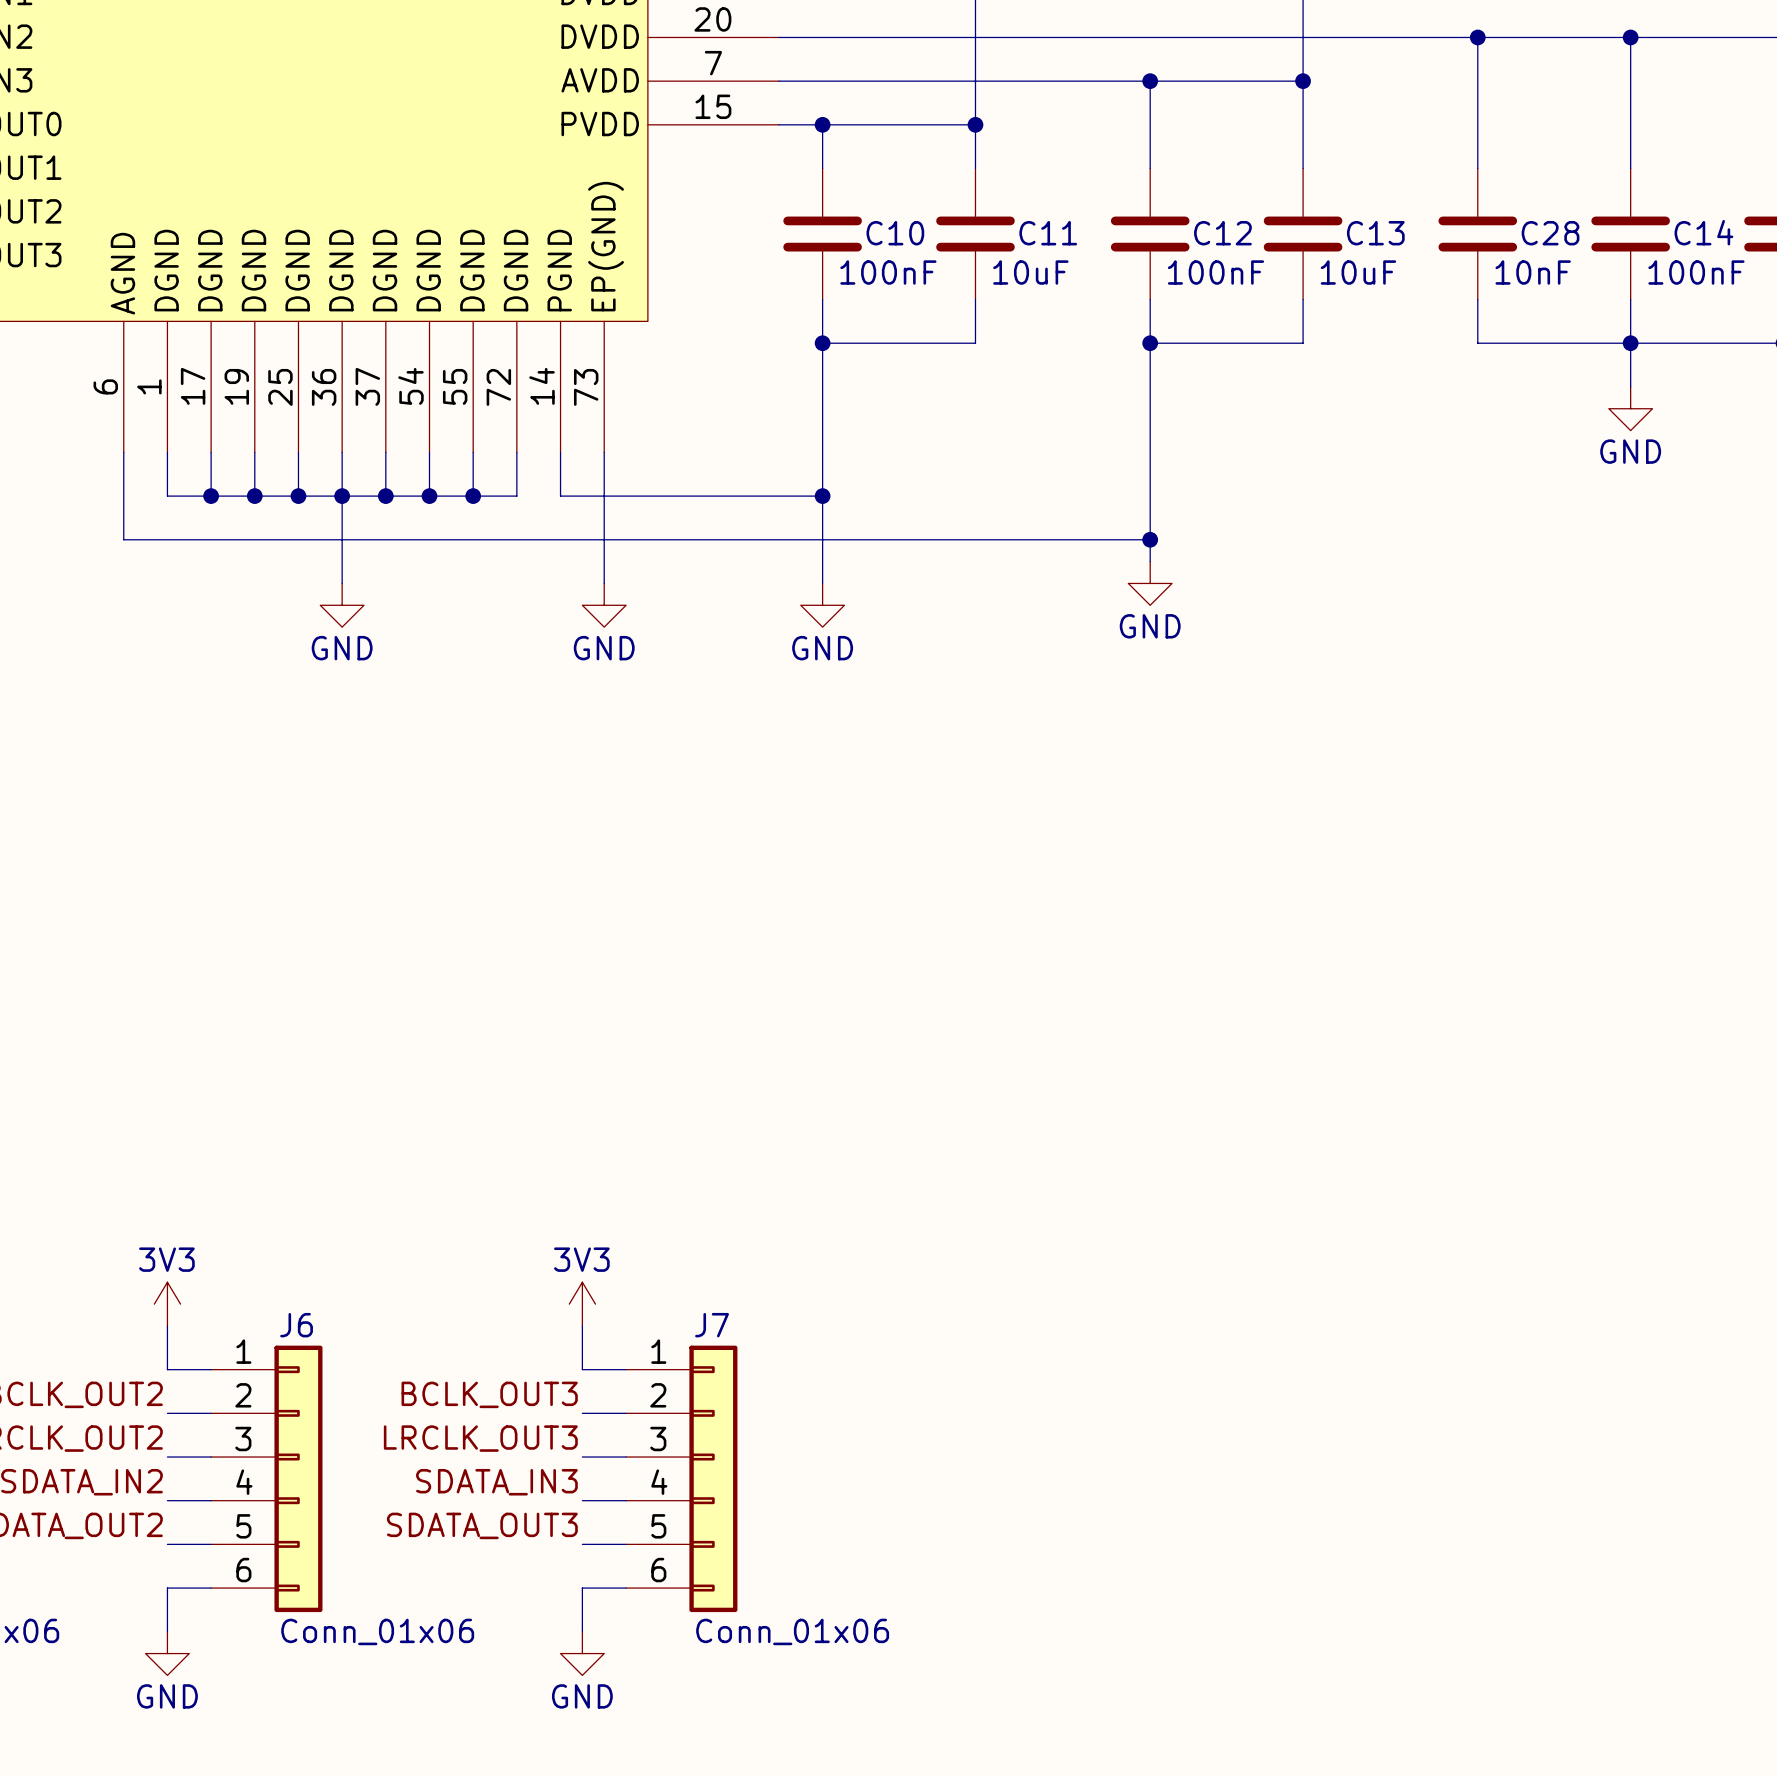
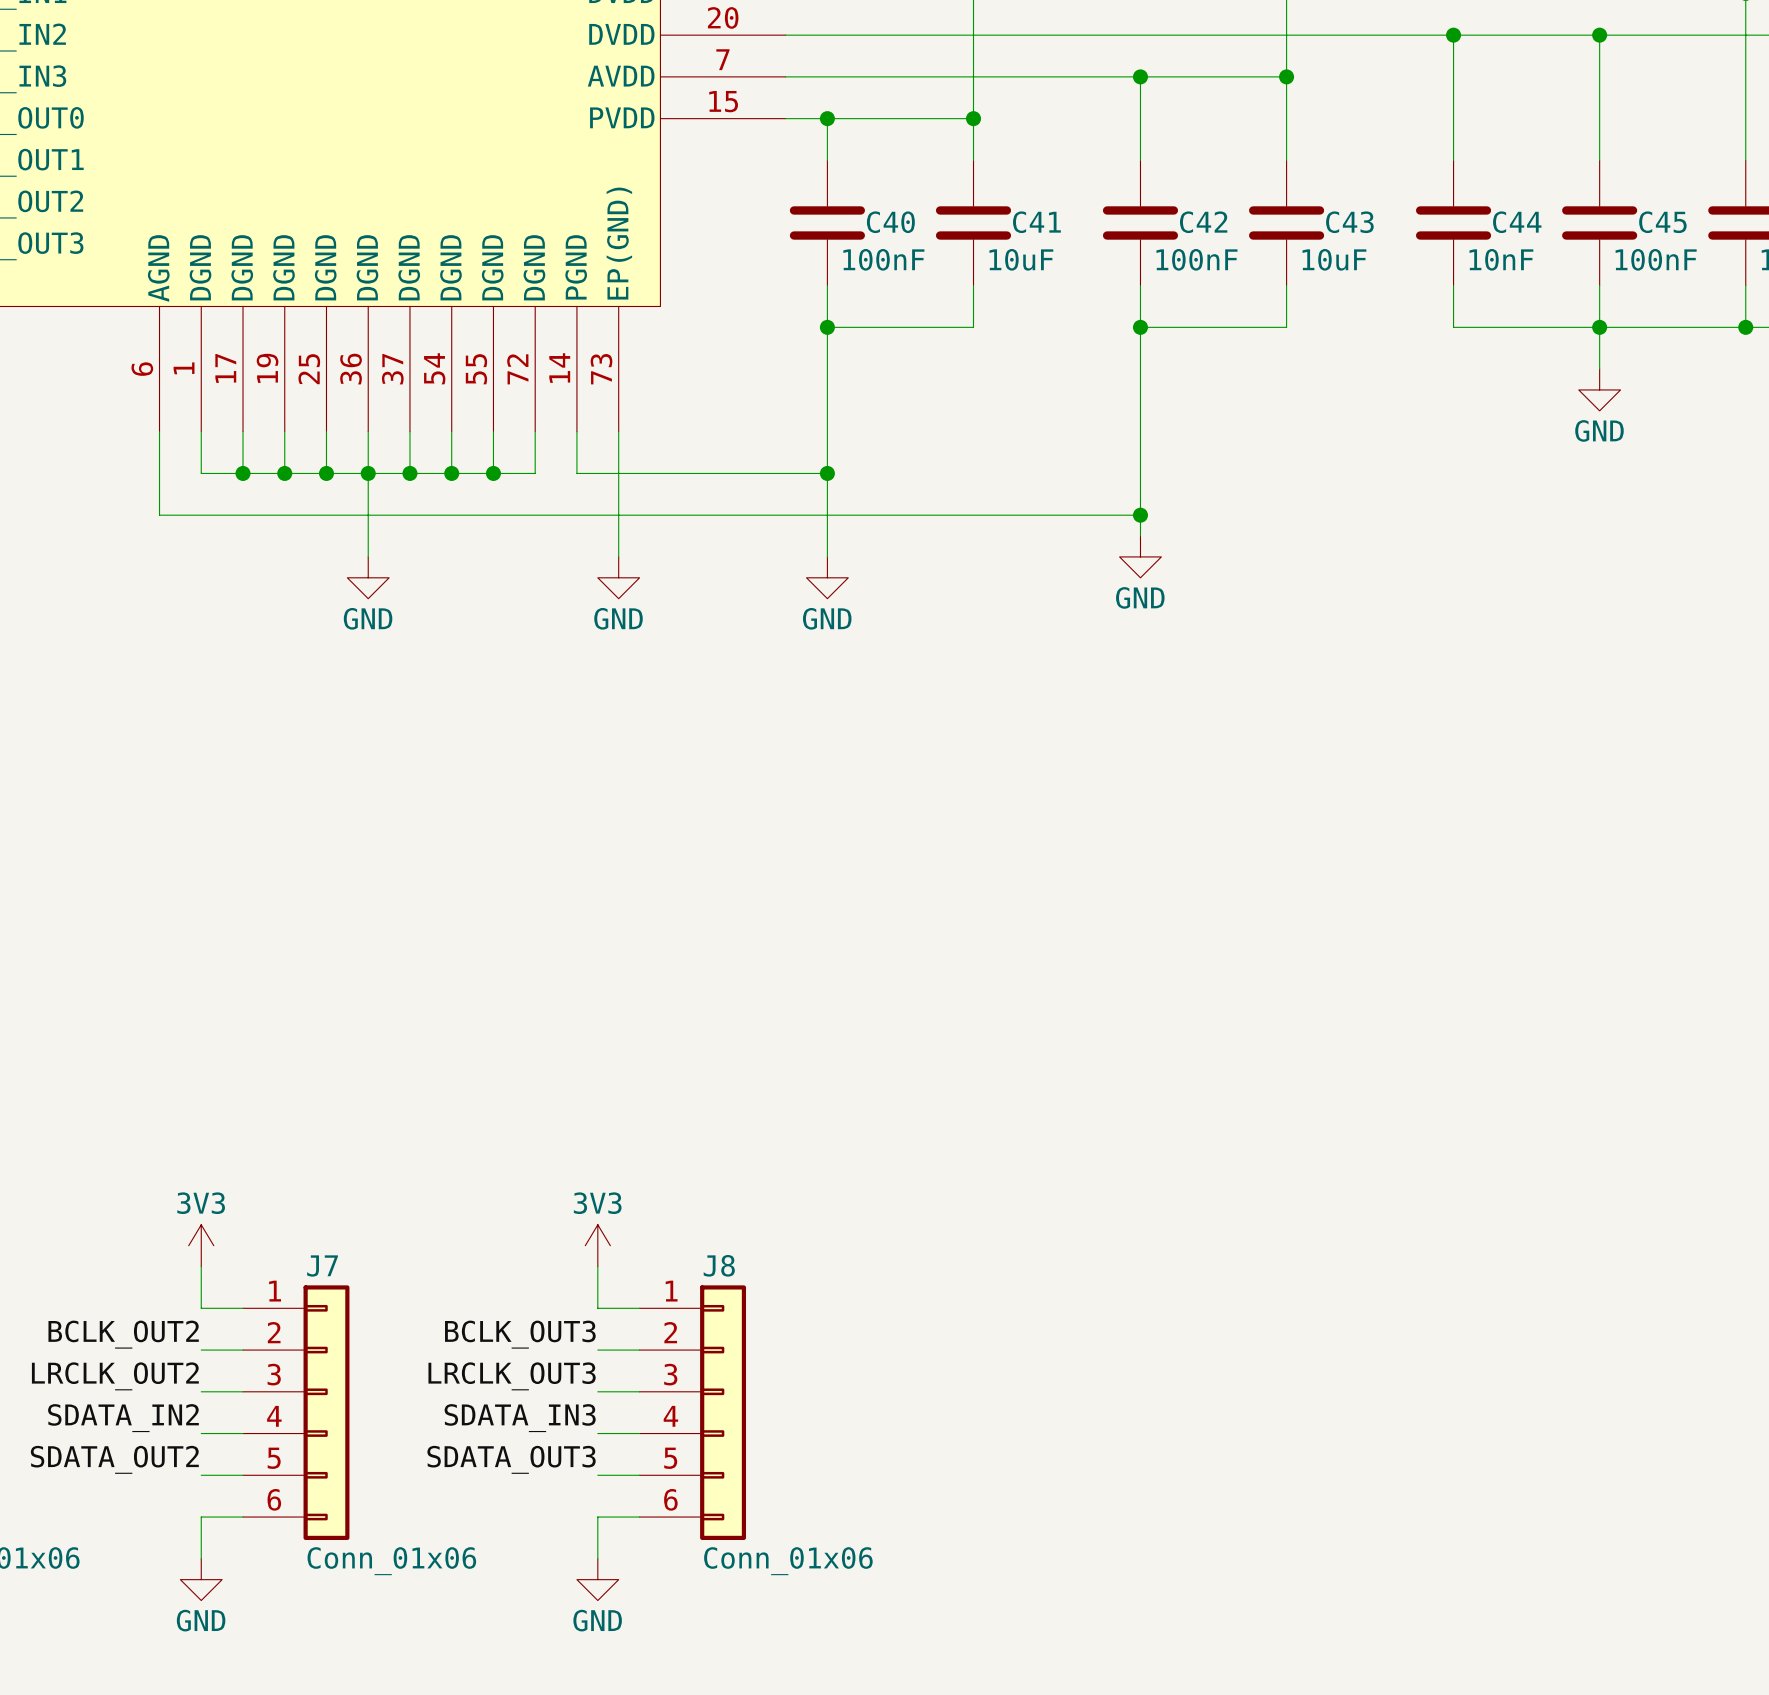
C14 name: C14 (1703, 232) -> C45 (1662, 222)
C10 name: C10 (895, 233) -> C40 (890, 222)
C11 name: C11 (1048, 233) -> C41 (1036, 222)
C12 name: C12 (1222, 233) -> C42 (1203, 222)
C13 name: C13 (1375, 233) -> C43 (1349, 222)
C28 name: C28 (1550, 233) -> C44 (1517, 222)
J6 name: J6 (296, 1325) -> J7 (322, 1265)
J7 name: J7 (712, 1325) -> J8 (719, 1265)

